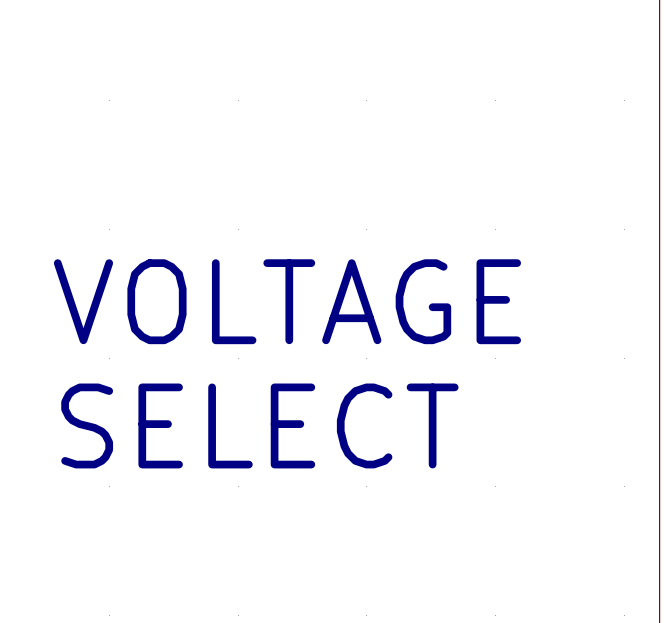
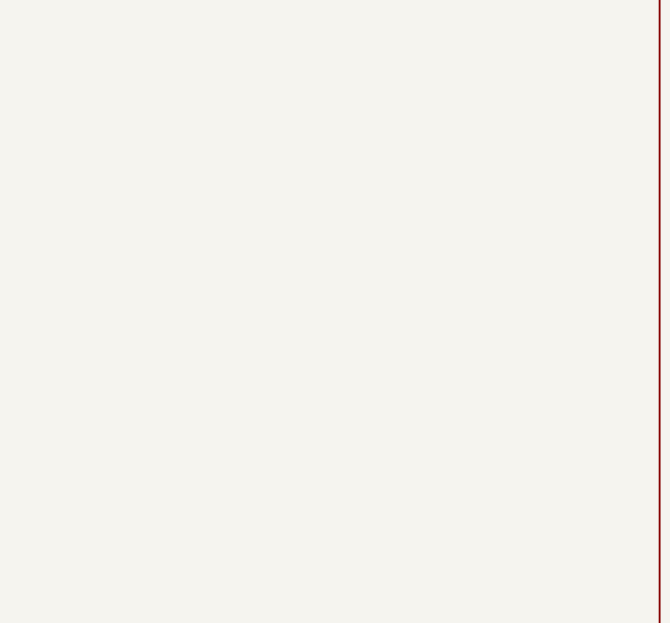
text: VOLTAGE (287, 301) -> none
text: SELECT (259, 425) -> none

